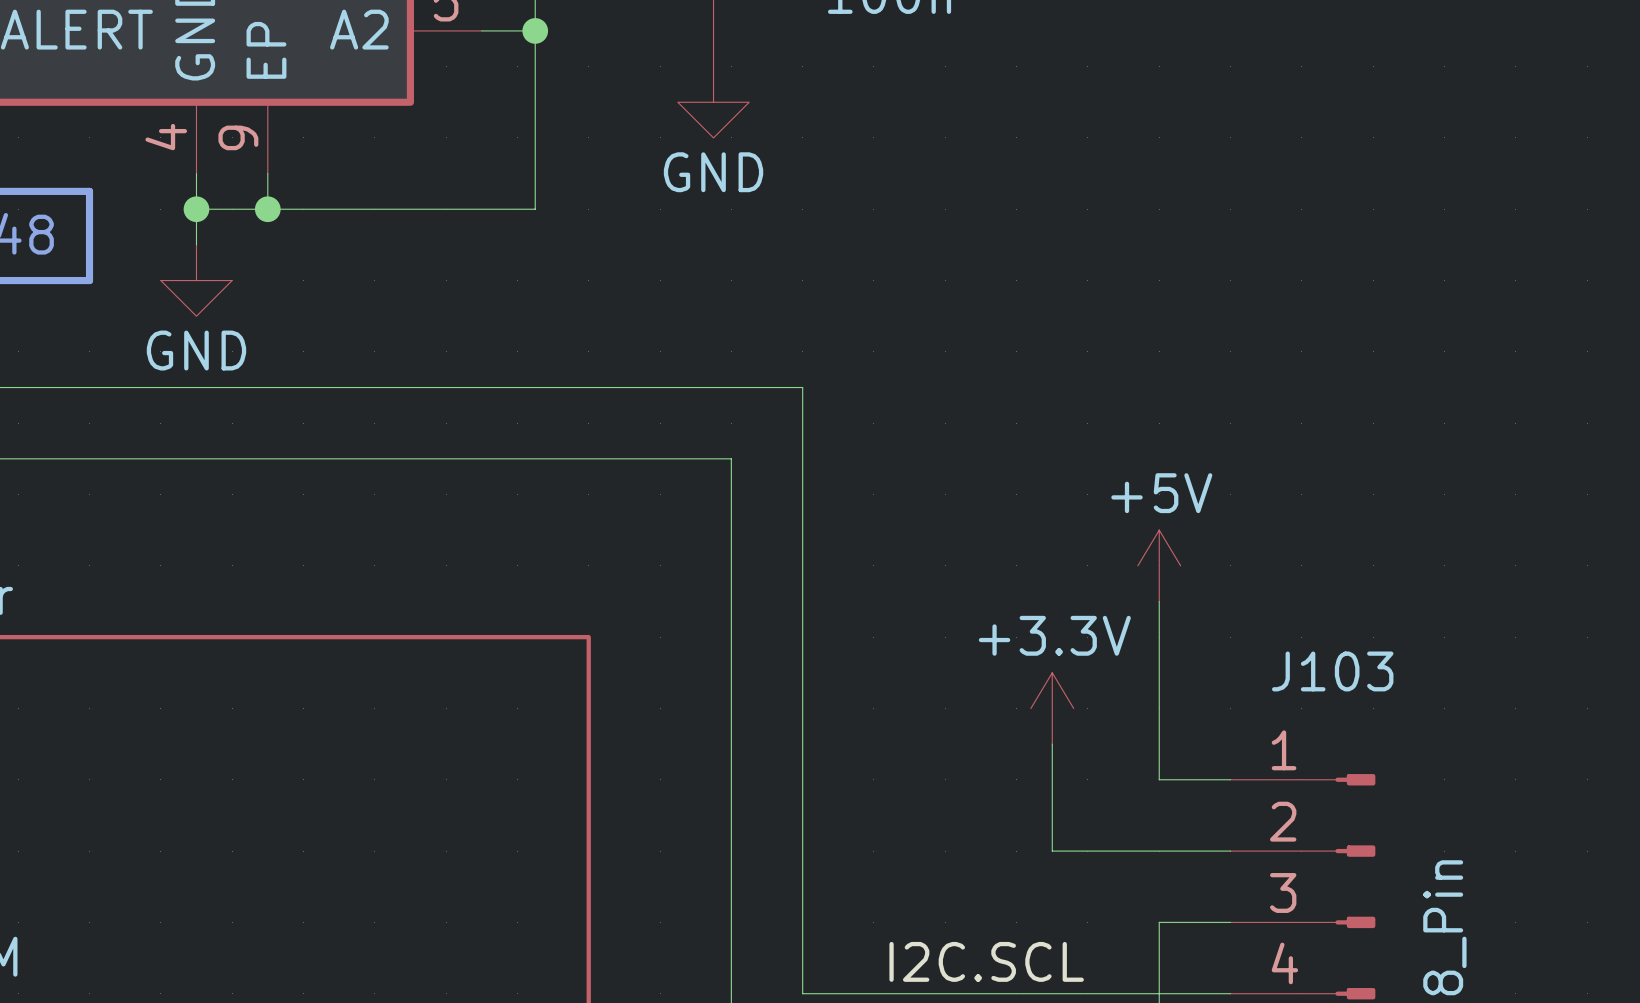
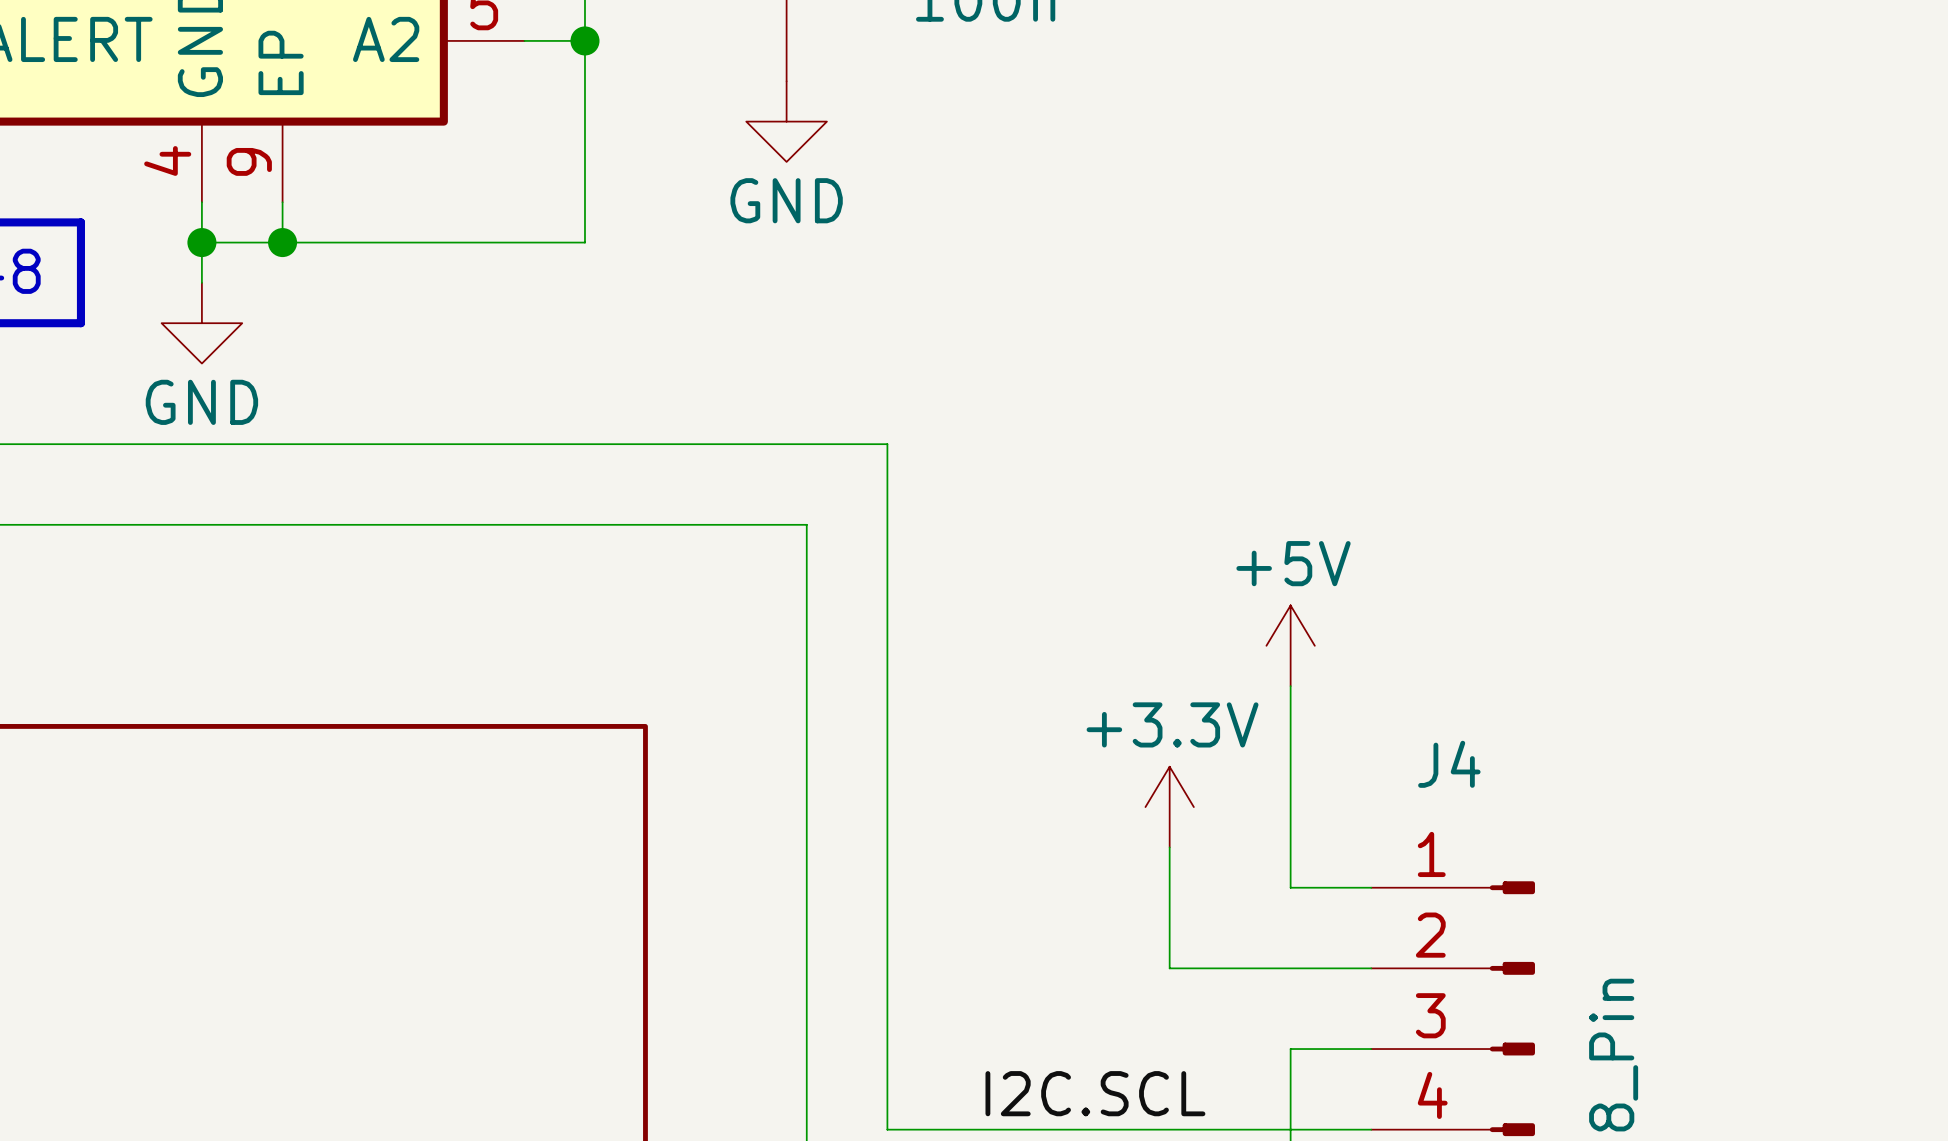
J103 name: J103 (1332, 671) -> J4 (1449, 764)

